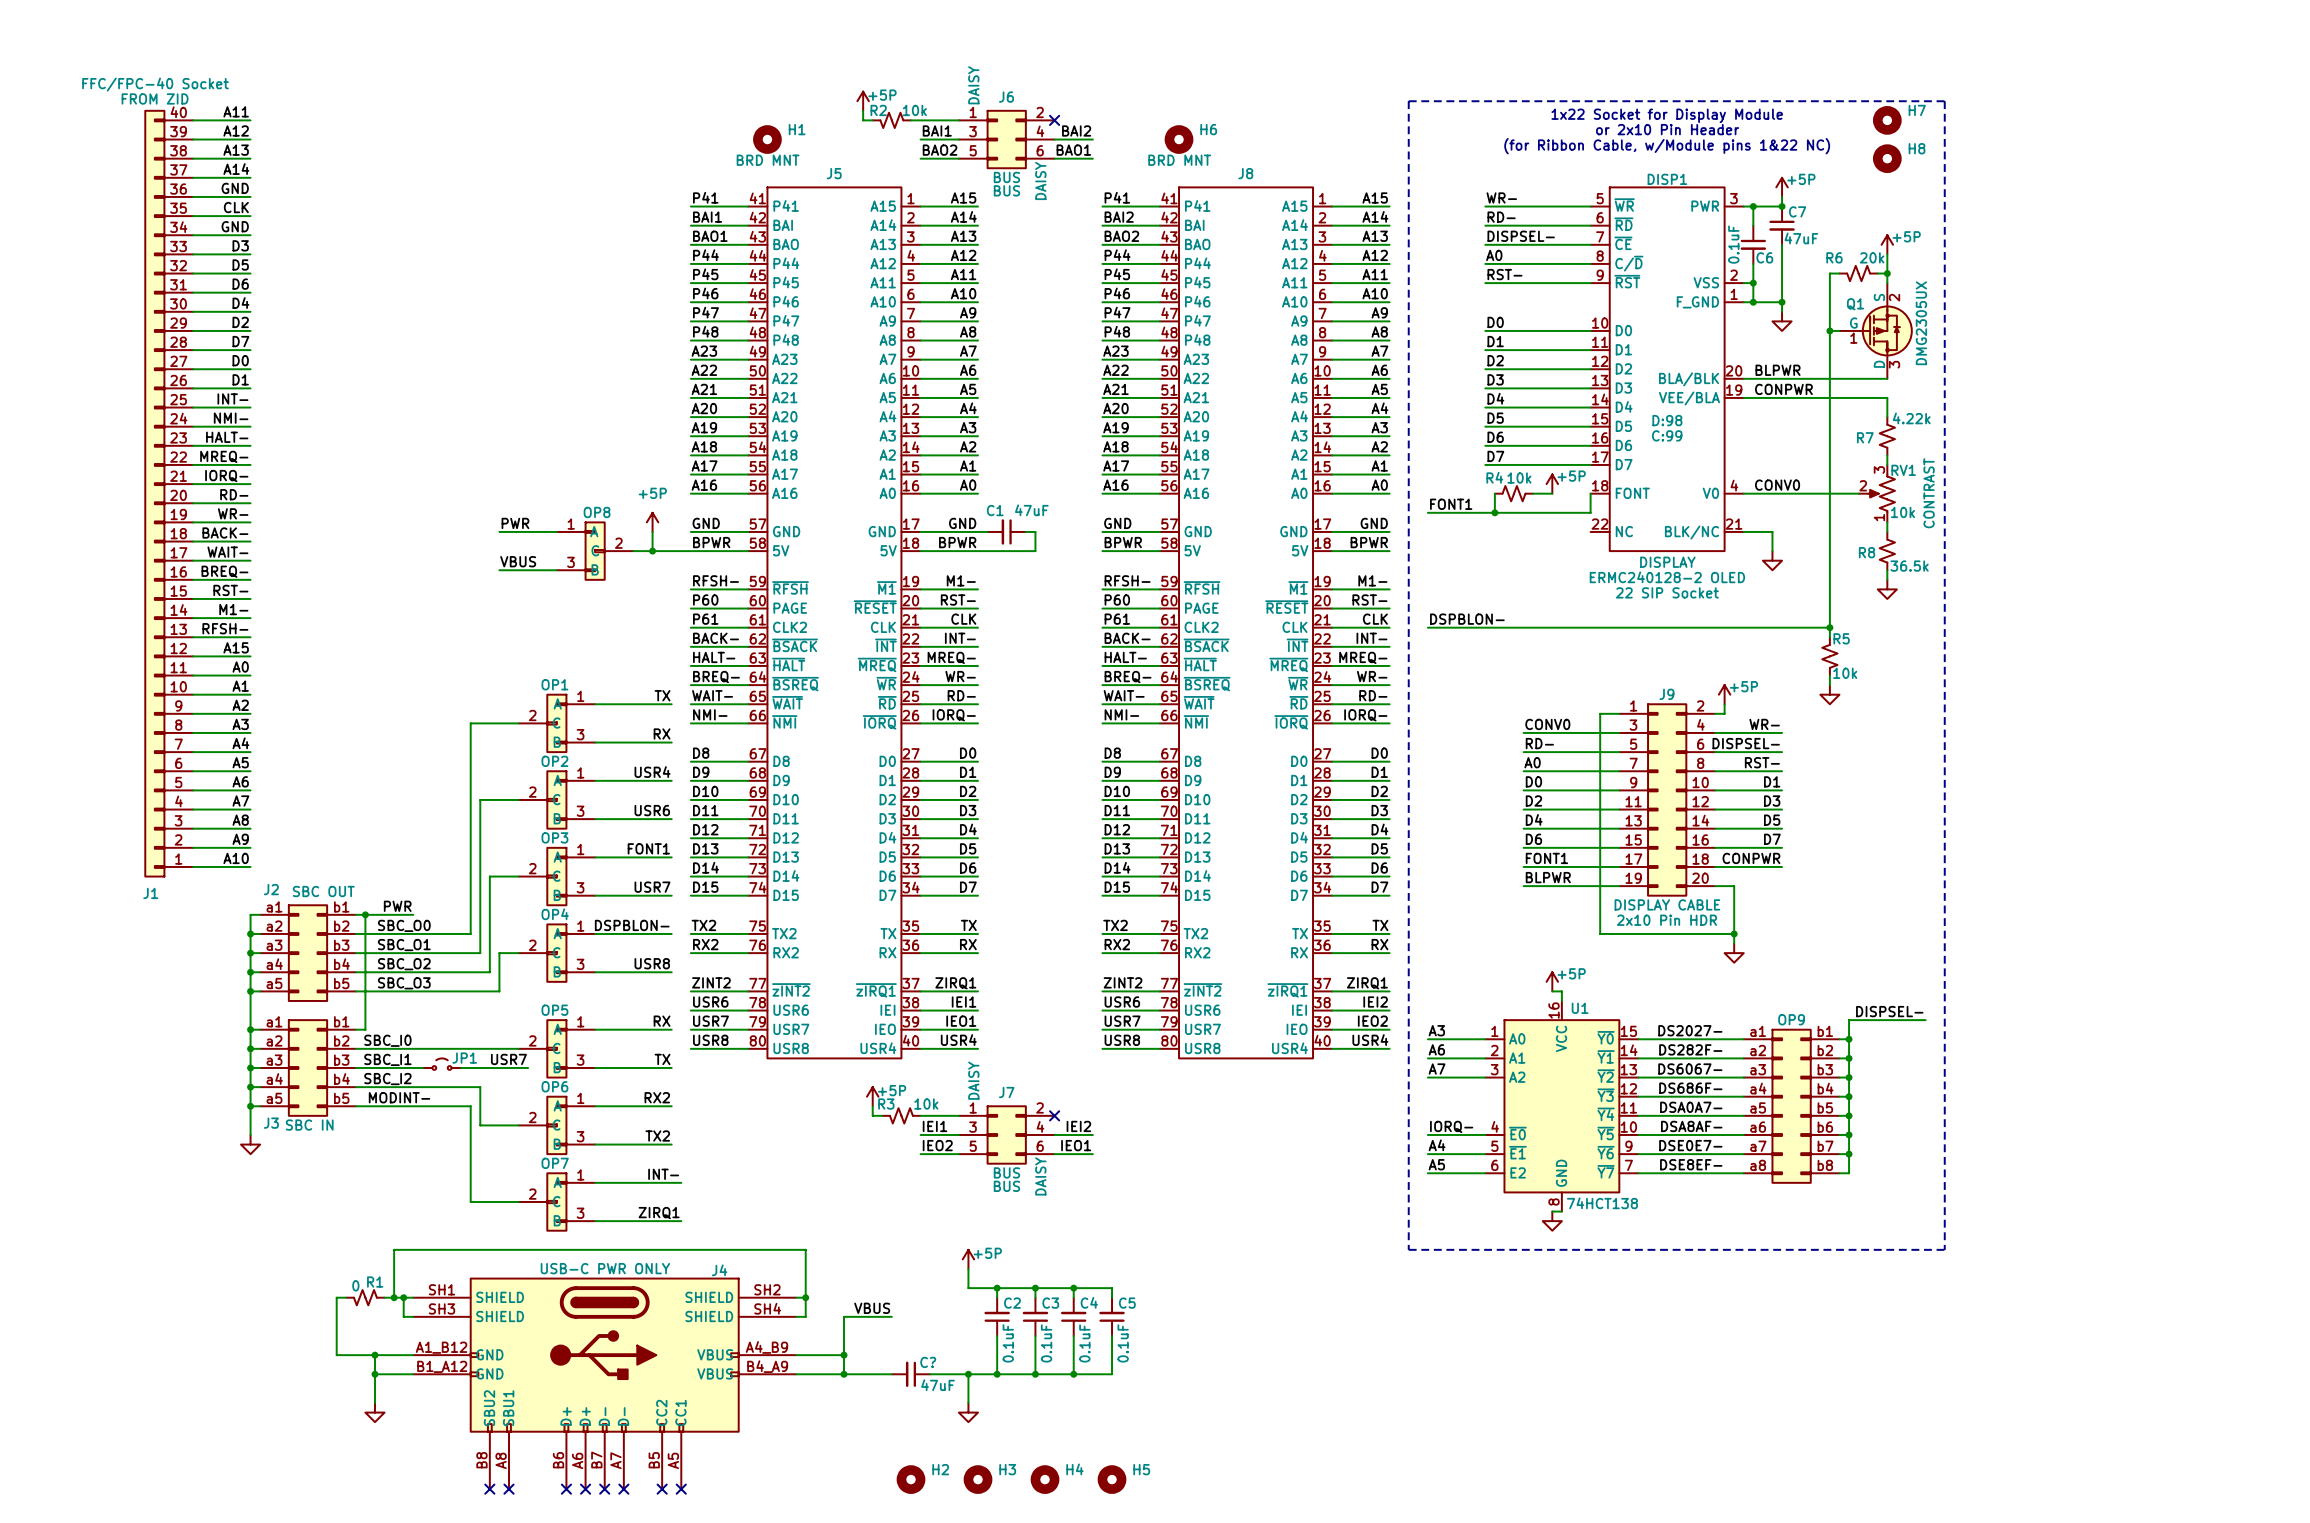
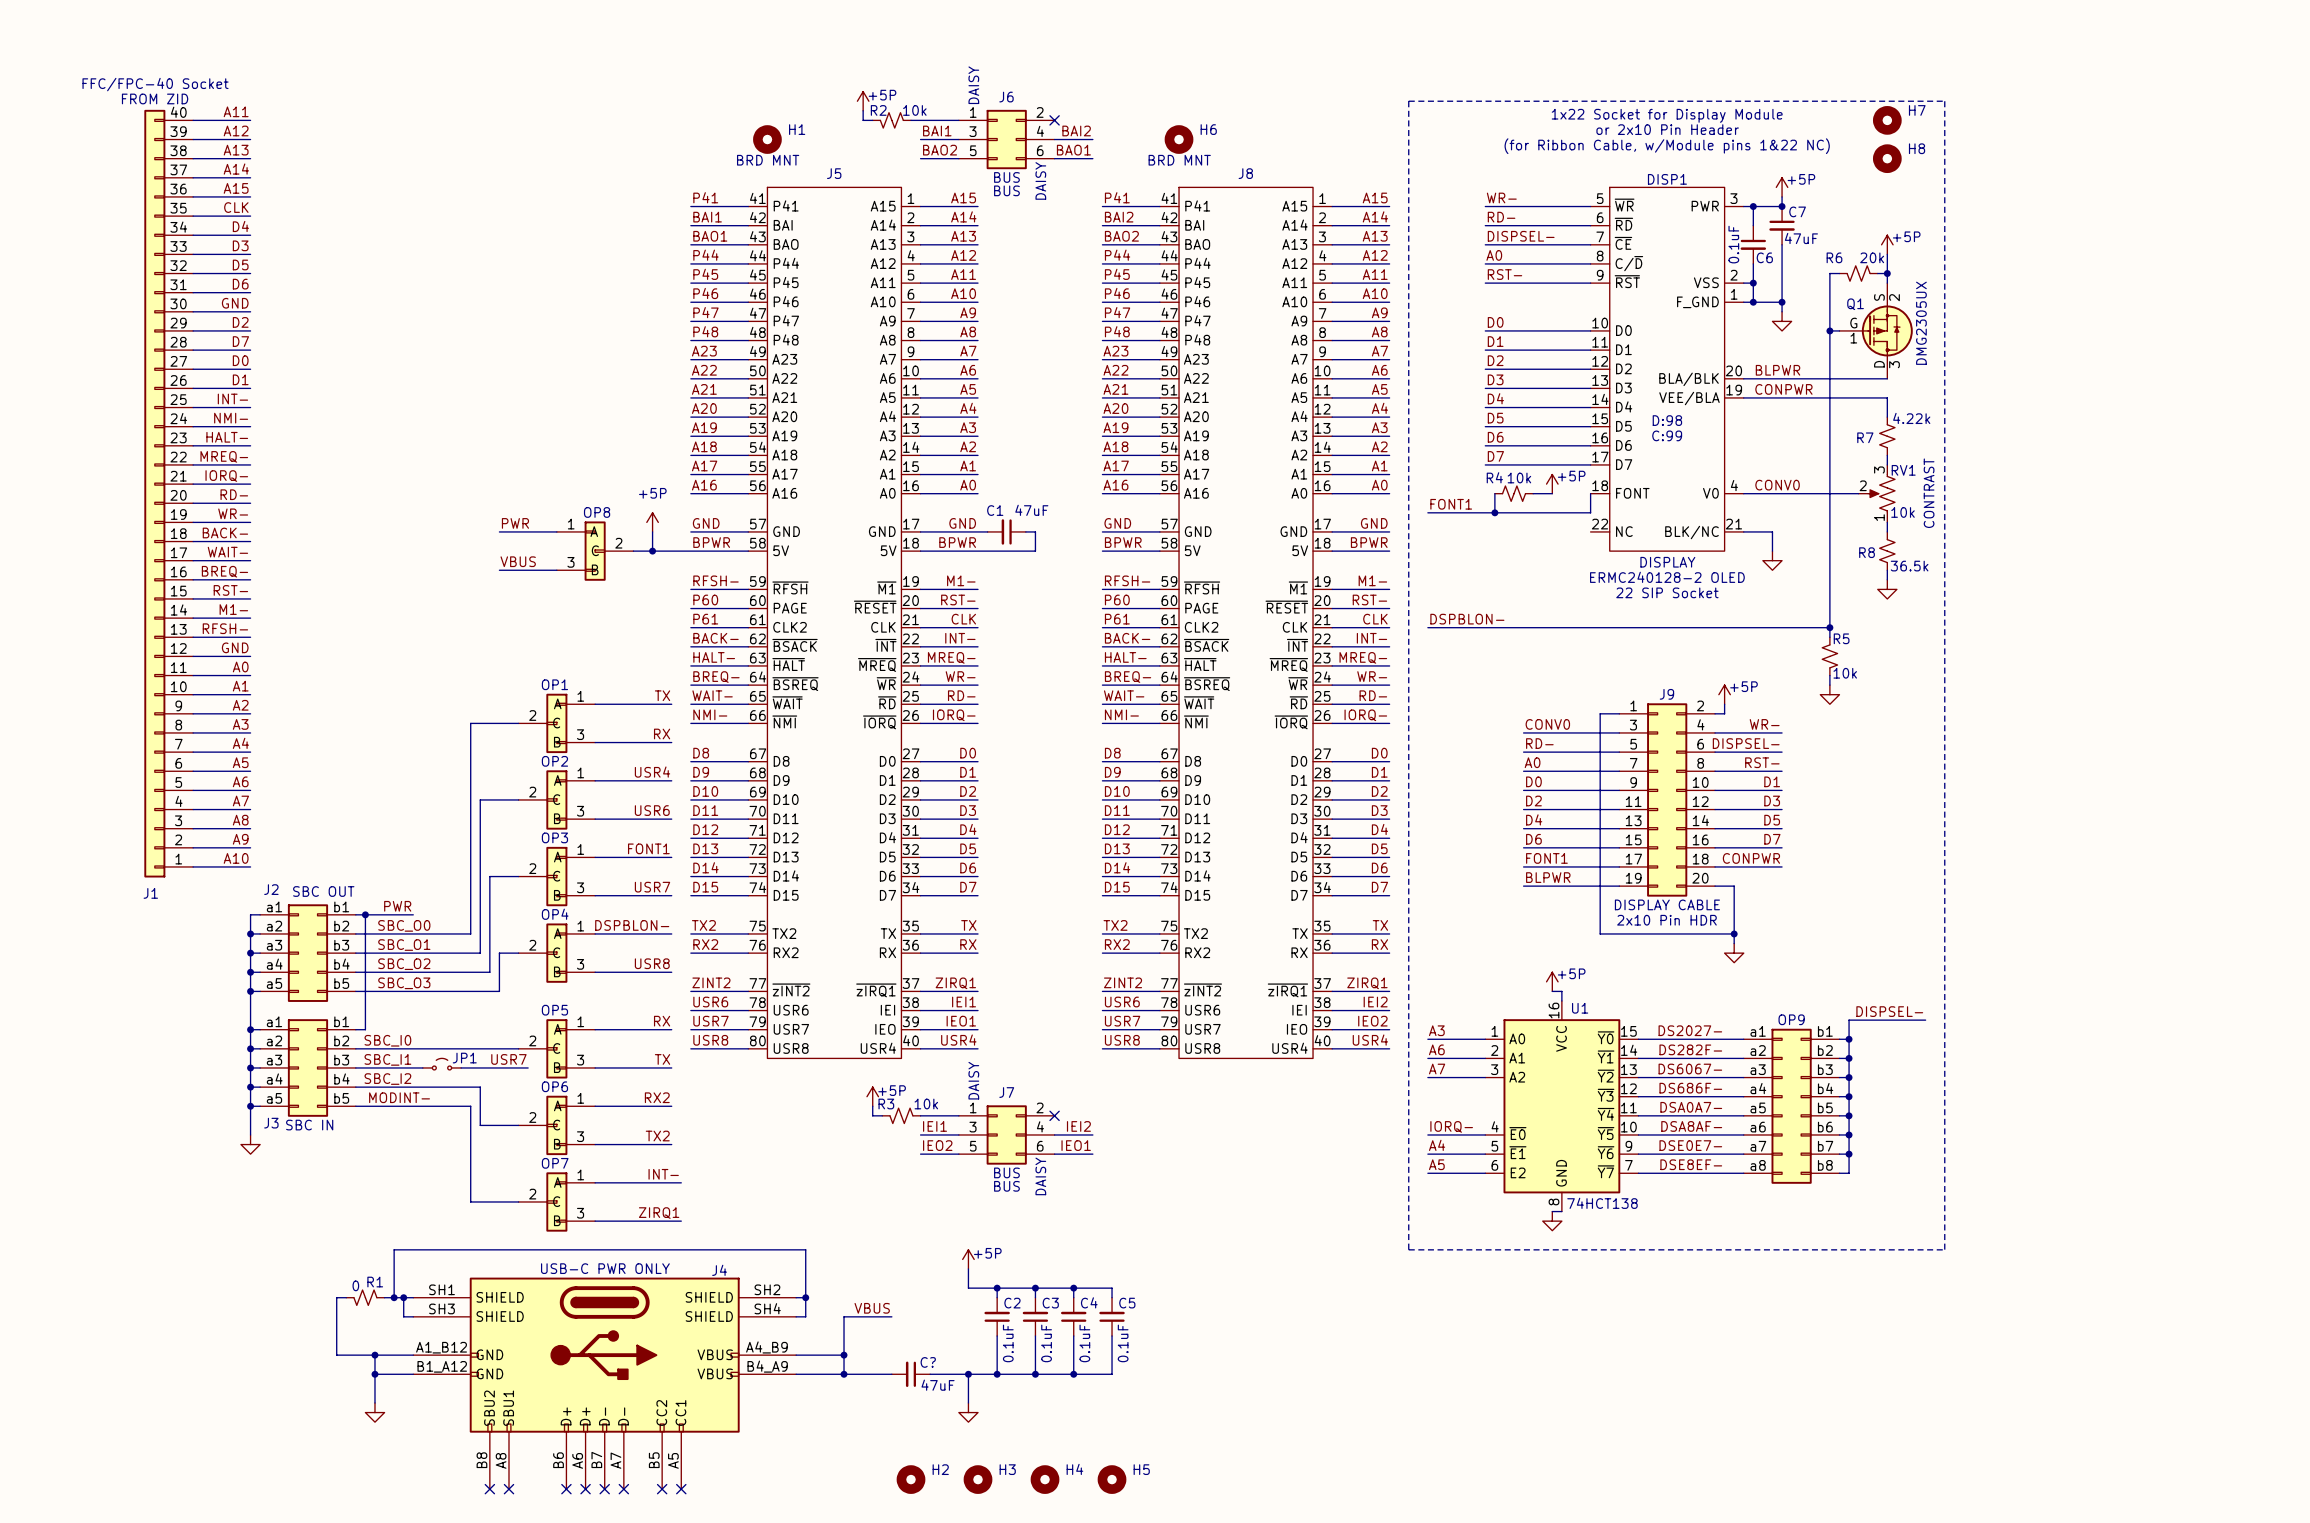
label: GND (235, 188) -> A15 (236, 188)
label: GND (235, 226) -> D4 (240, 226)
label: D4 (240, 303) -> GND (235, 303)
label: A15 (236, 647) -> GND (235, 647)

